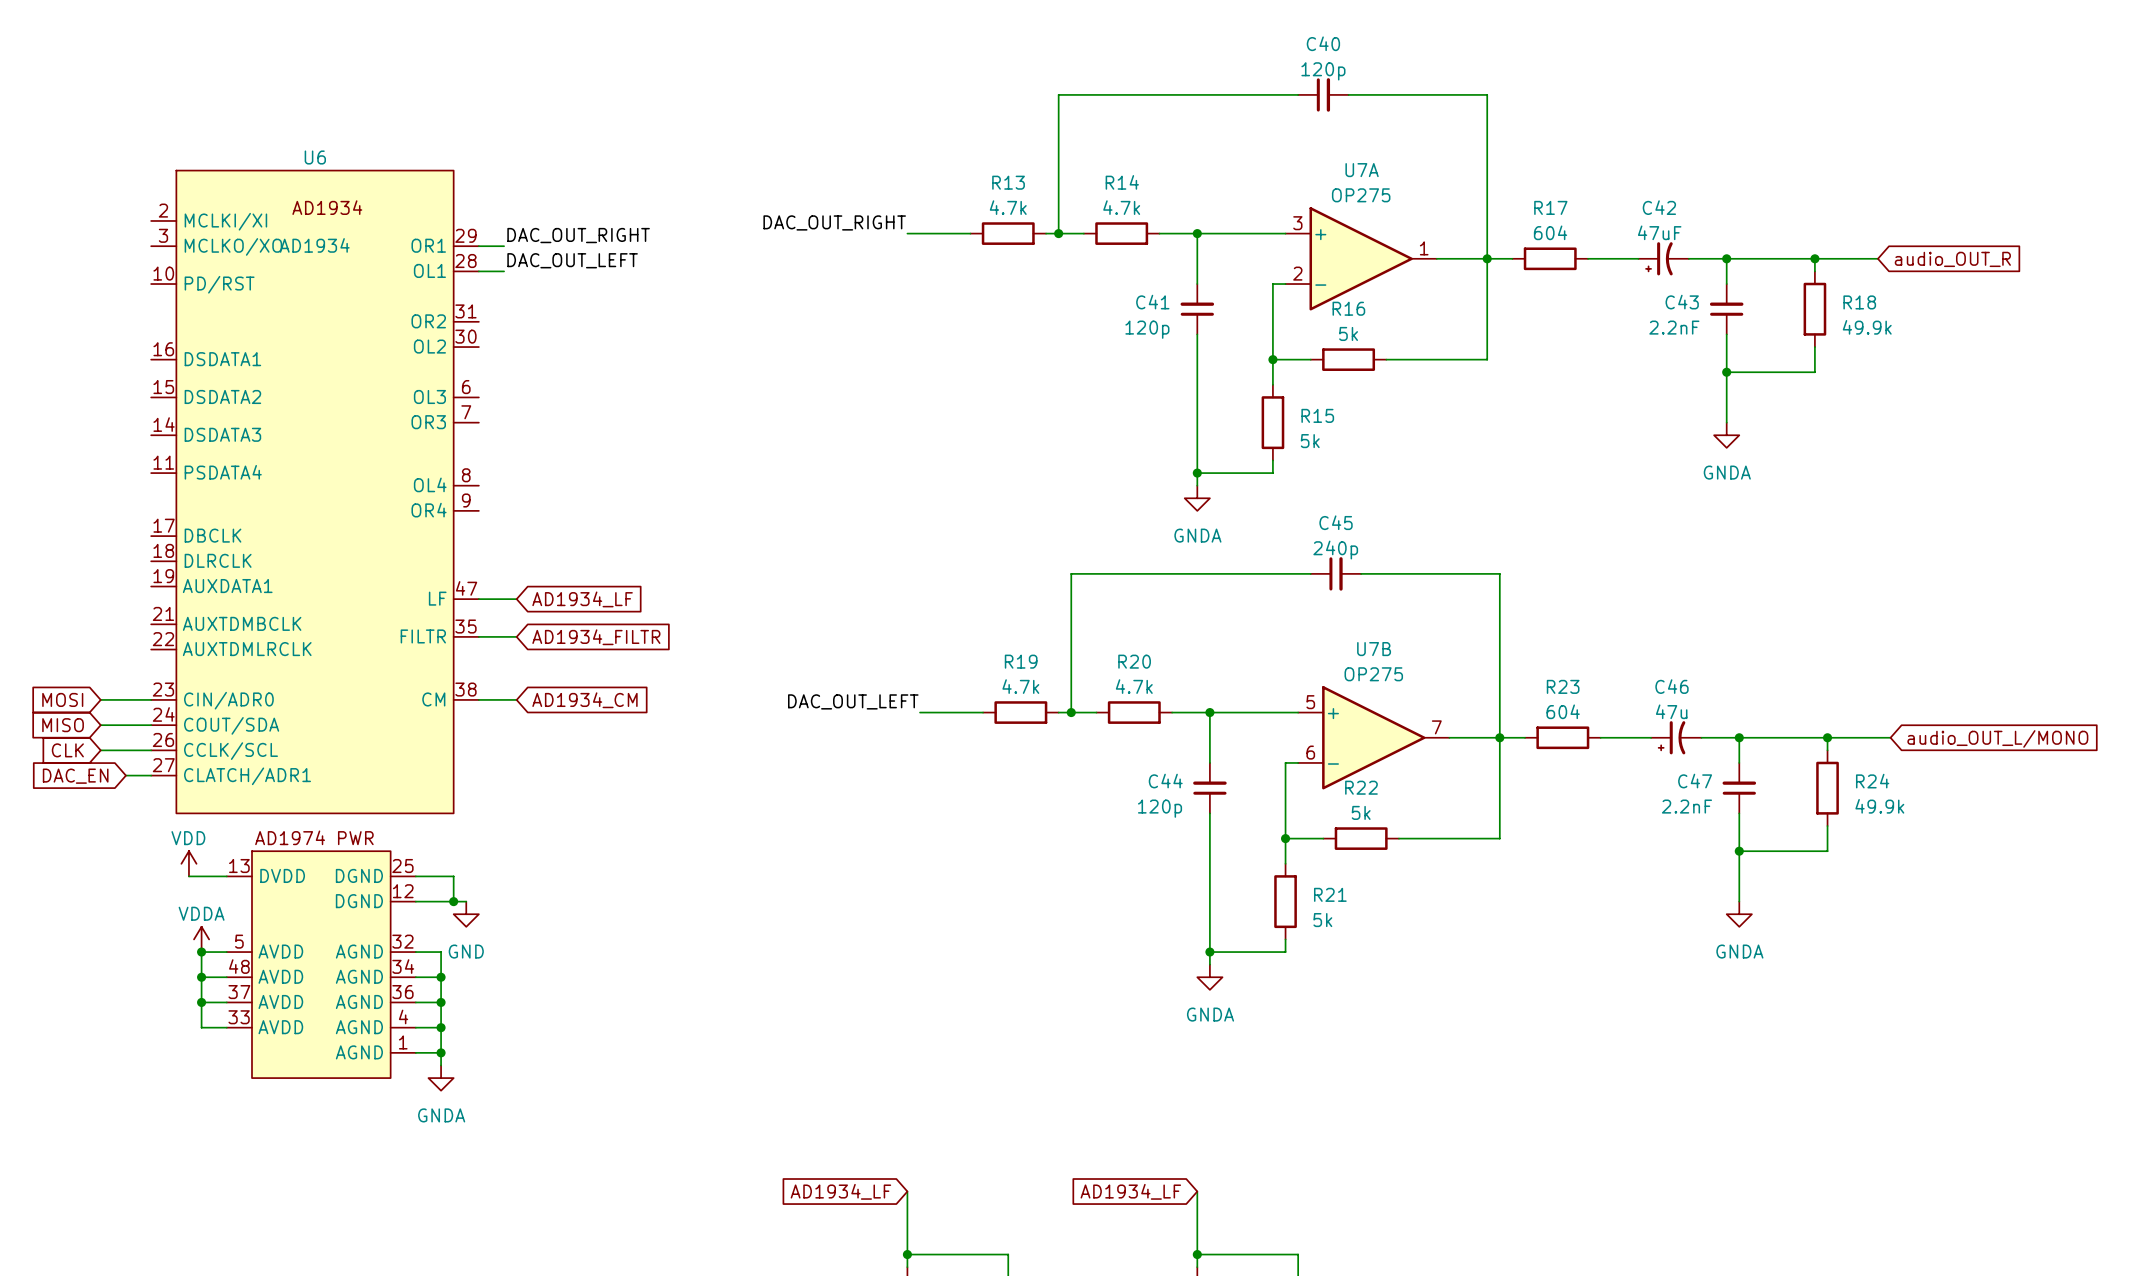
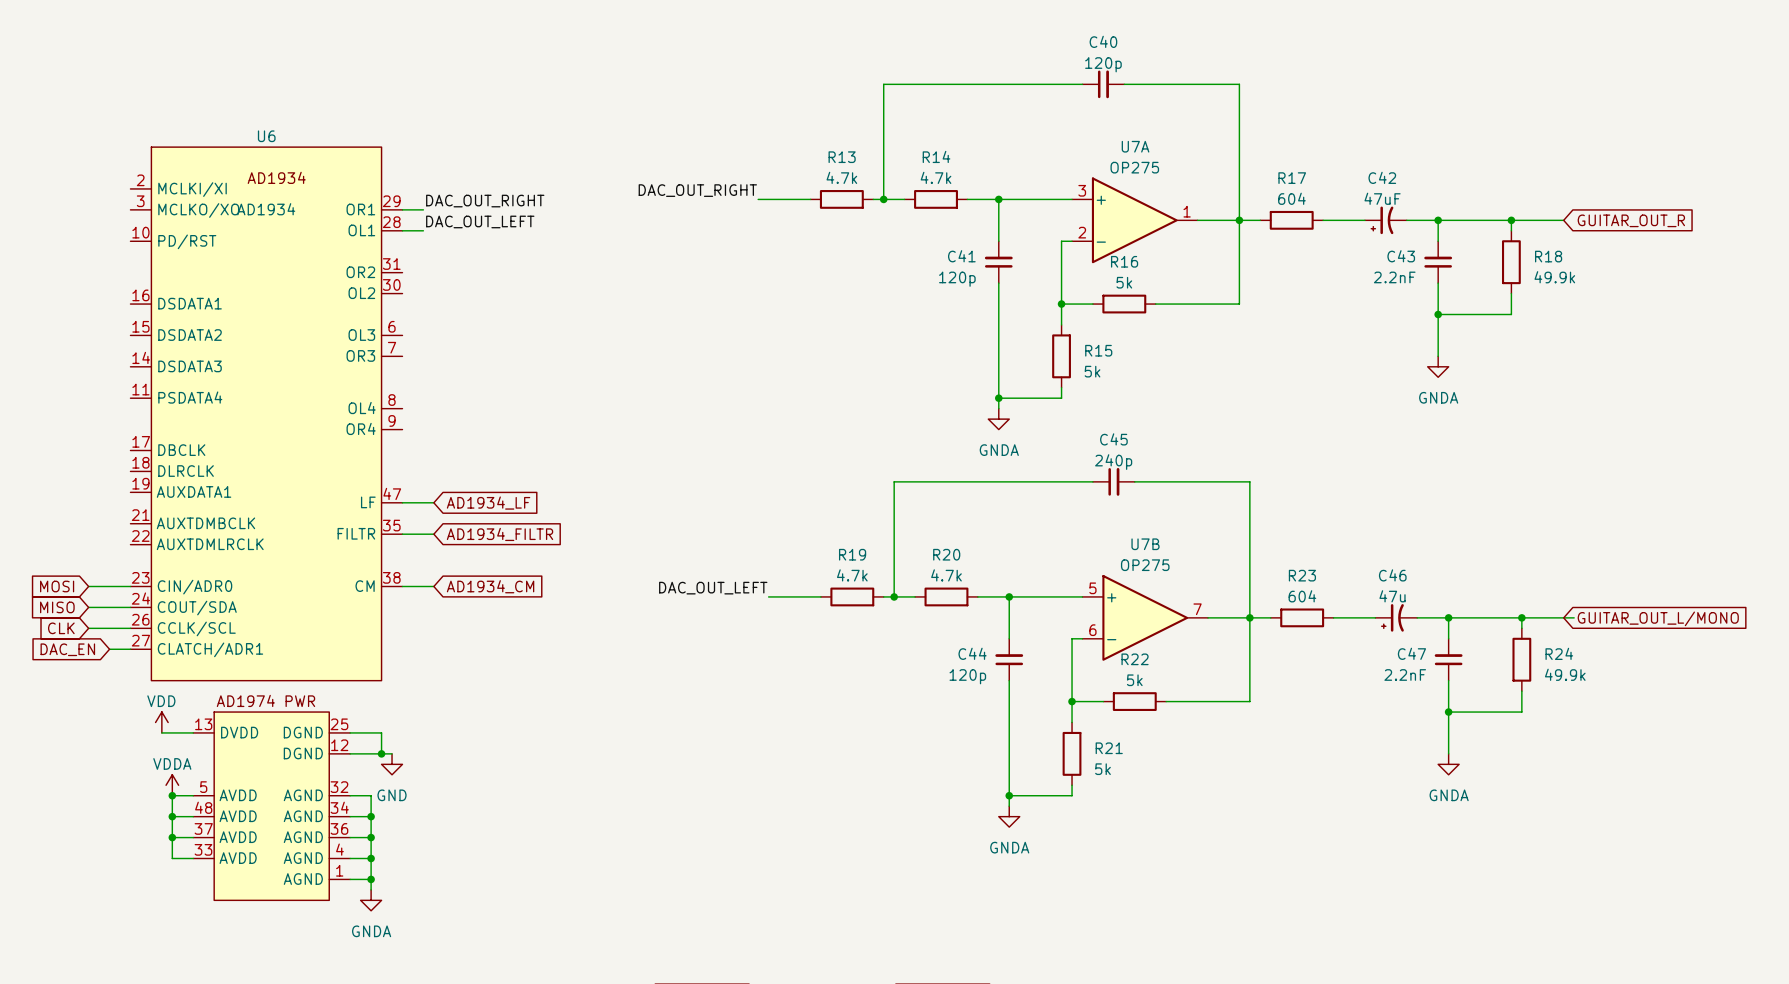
global label: audio_OUT_R (1952, 259) -> GUITAR_OUT_R (1631, 220)
global label: audio_OUT_L/MONO (1997, 738) -> GUITAR_OUT_L/MONO (1658, 618)

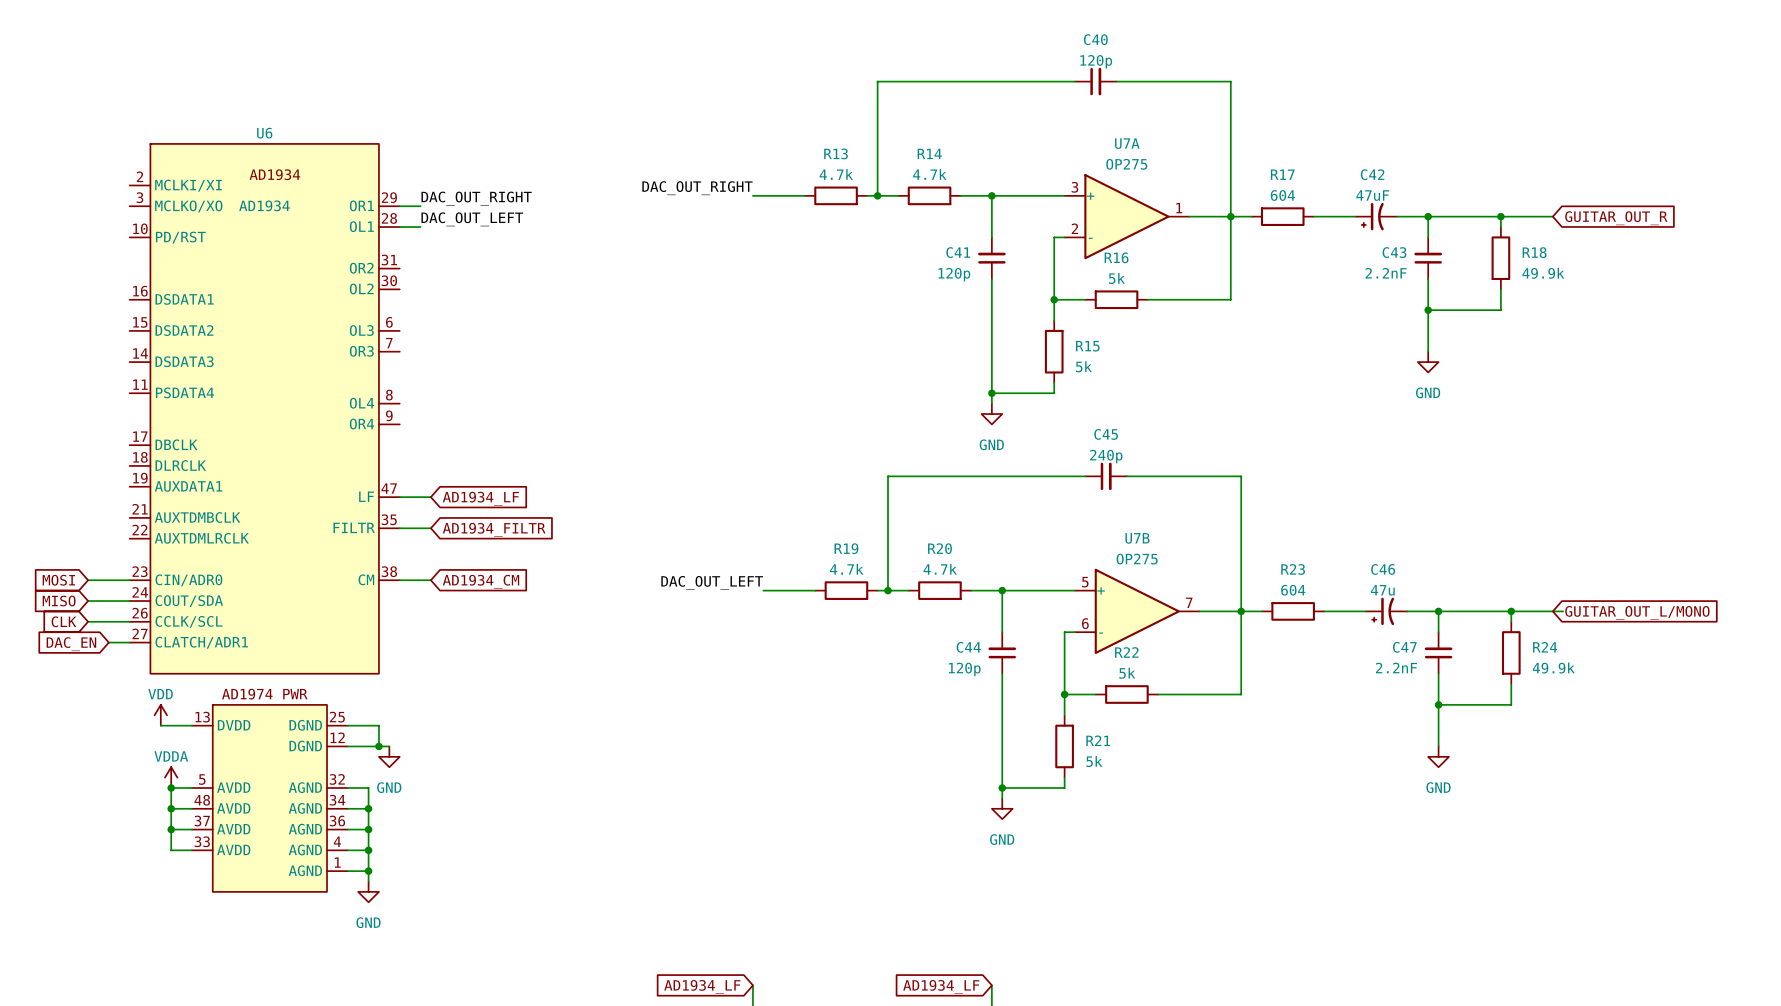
power symbol: GNDA (1438, 366) -> GND (1428, 362)
power symbol: GNDA (998, 419) -> GND (991, 414)
power symbol: GNDA (1448, 764) -> GND (1438, 756)
power symbol: GNDA (1009, 816) -> GND (1002, 808)
power symbol: GNDA (371, 900) -> GND (368, 891)

